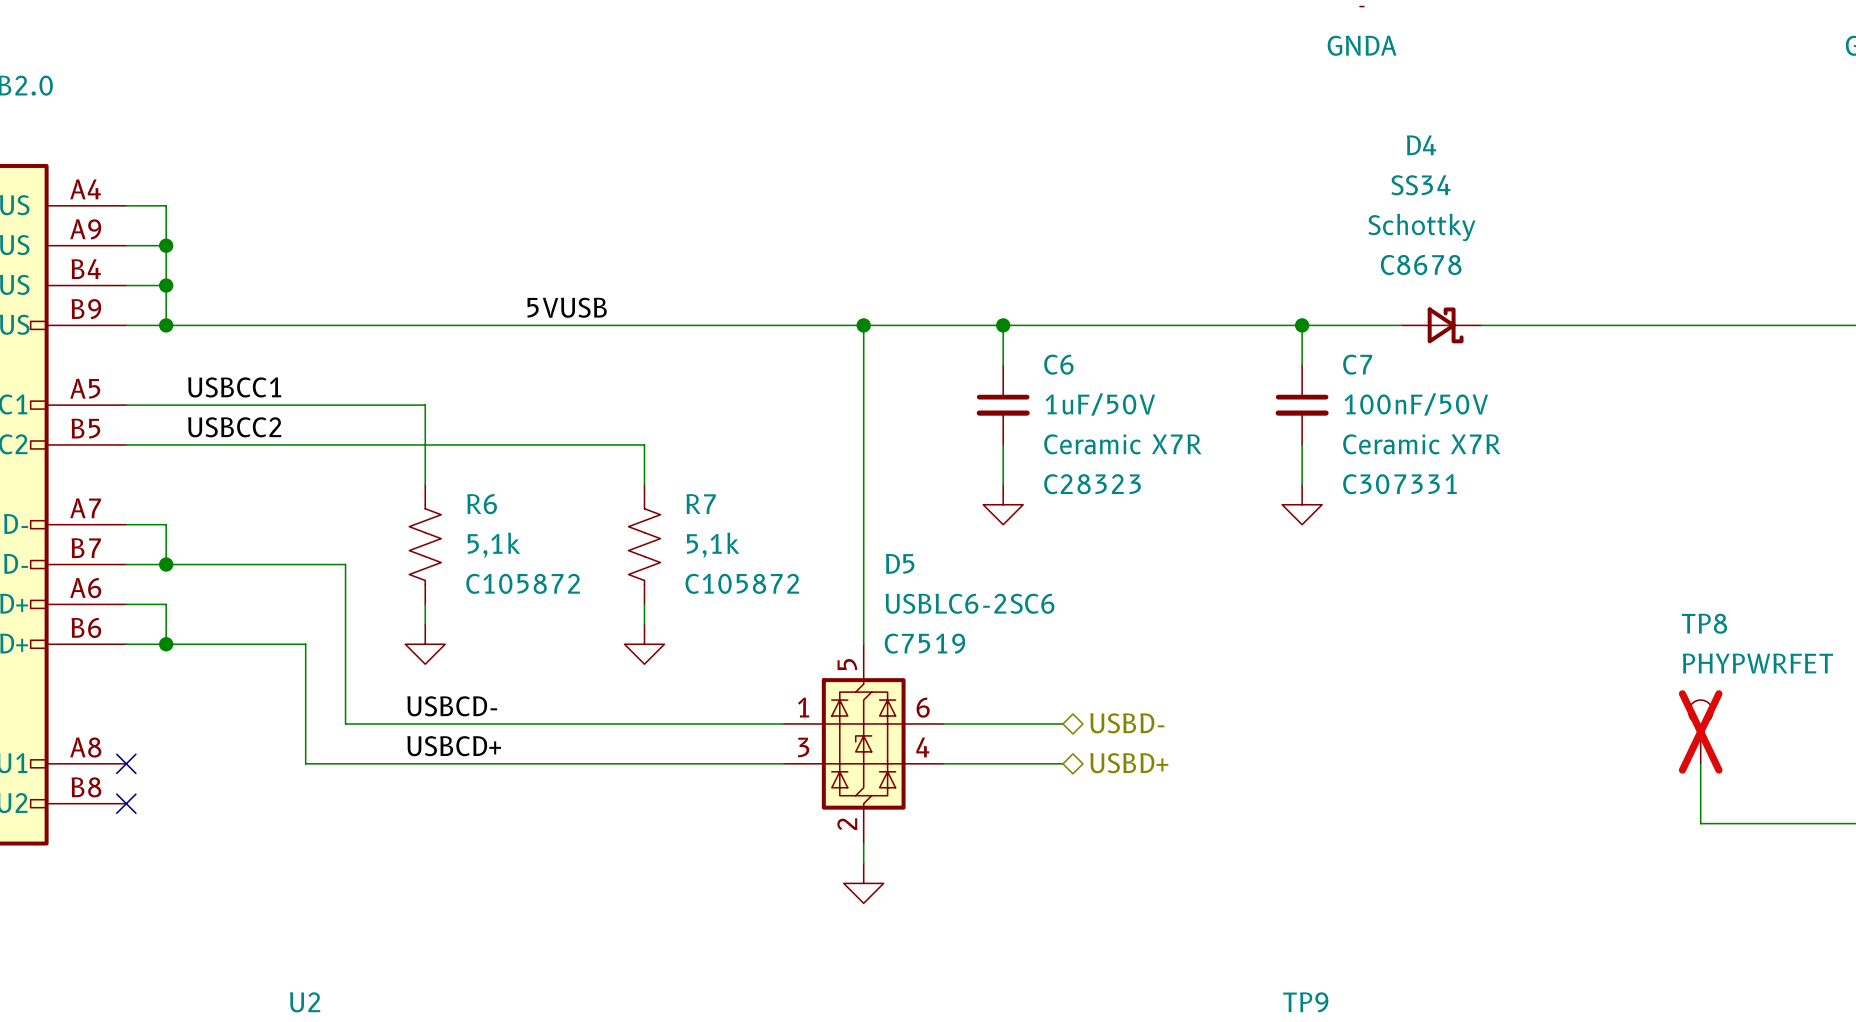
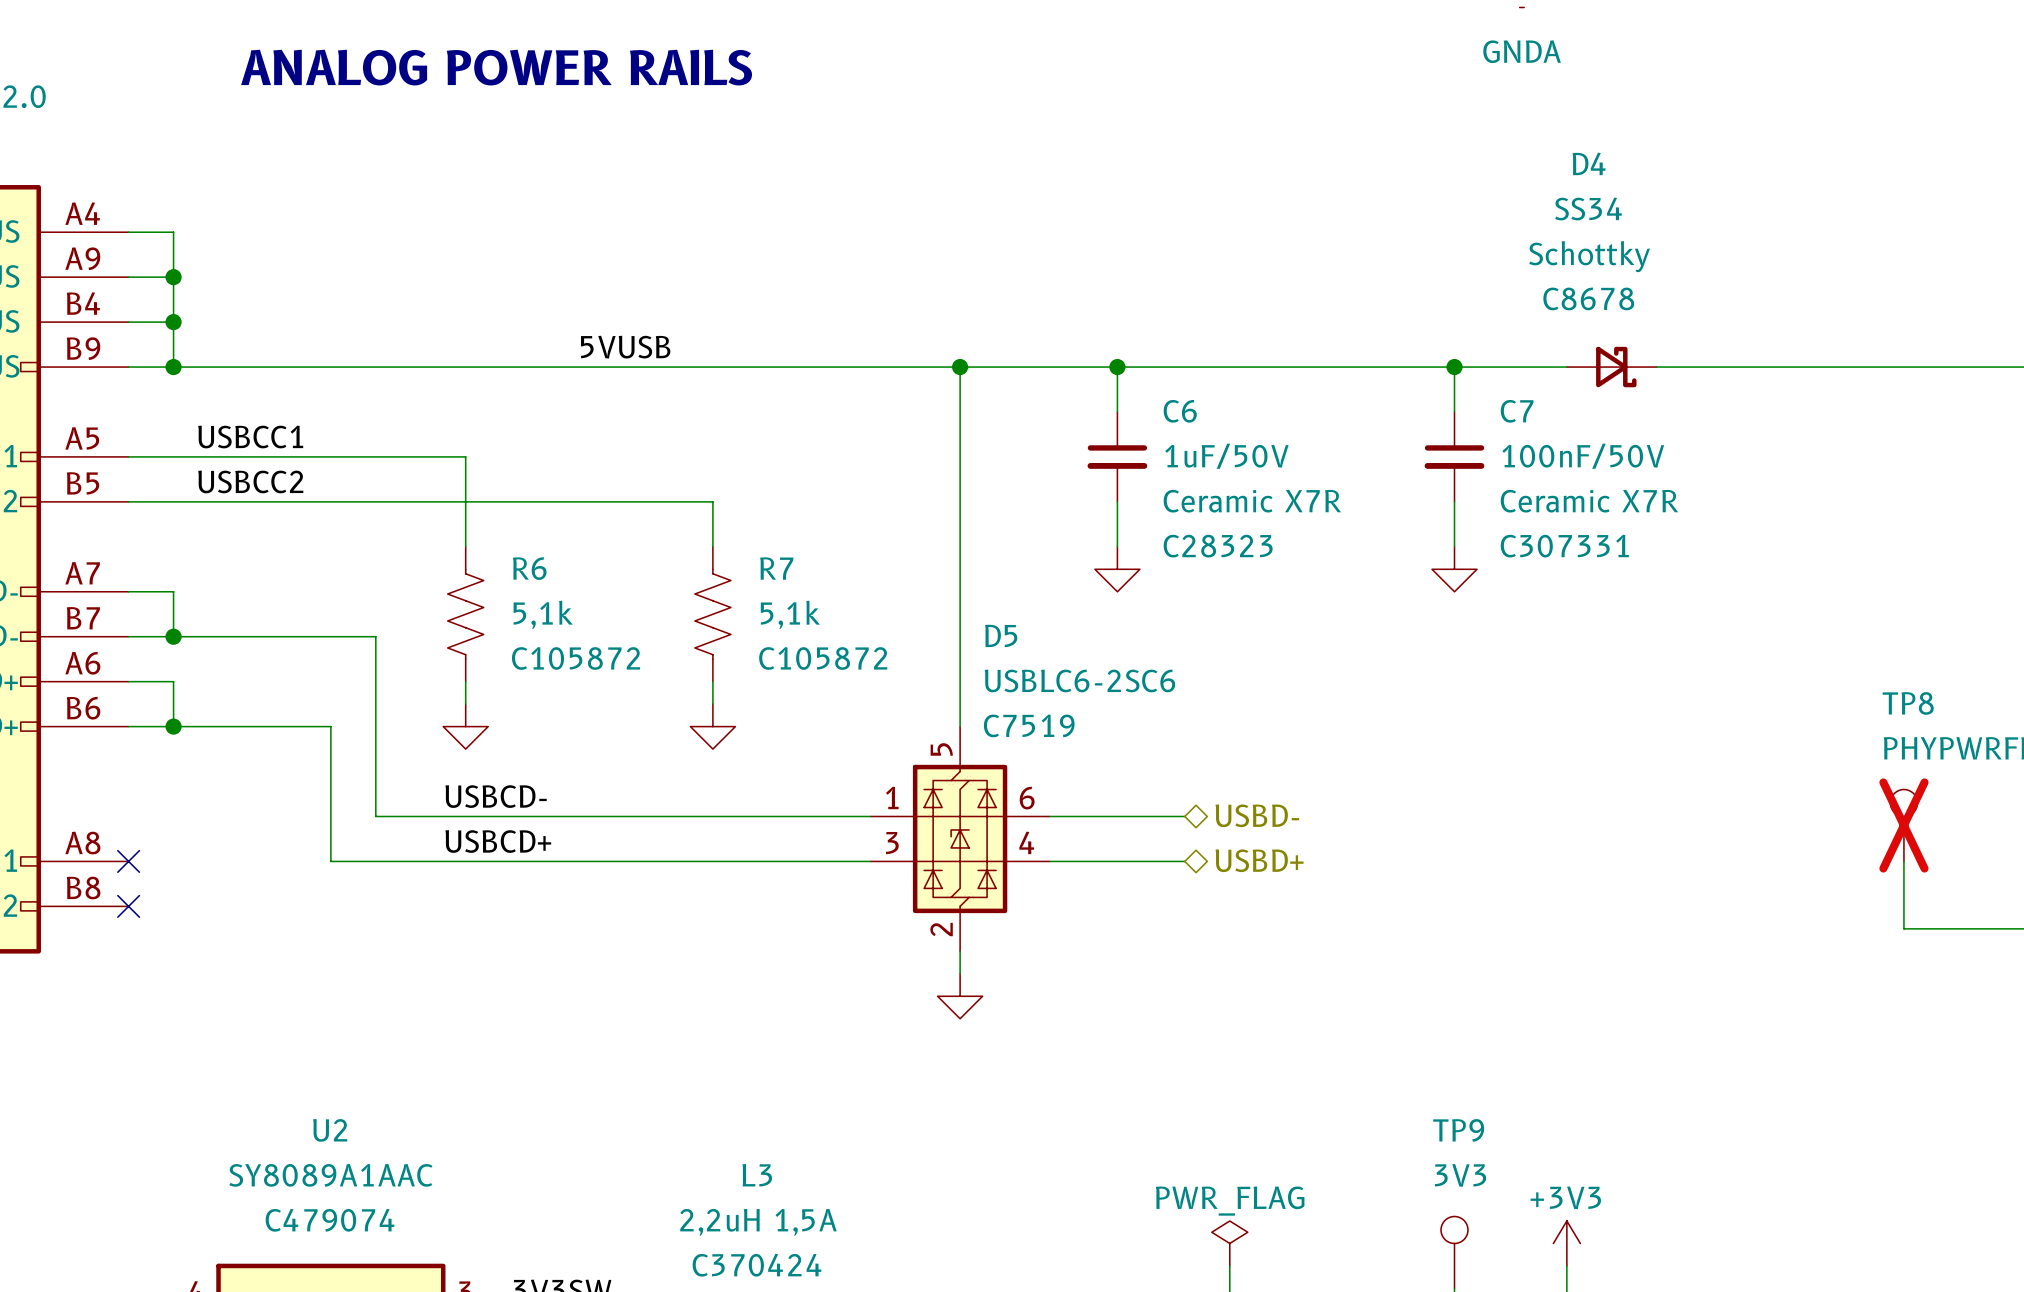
text: none -> ANALOG POWER RAILS (496, 67)

